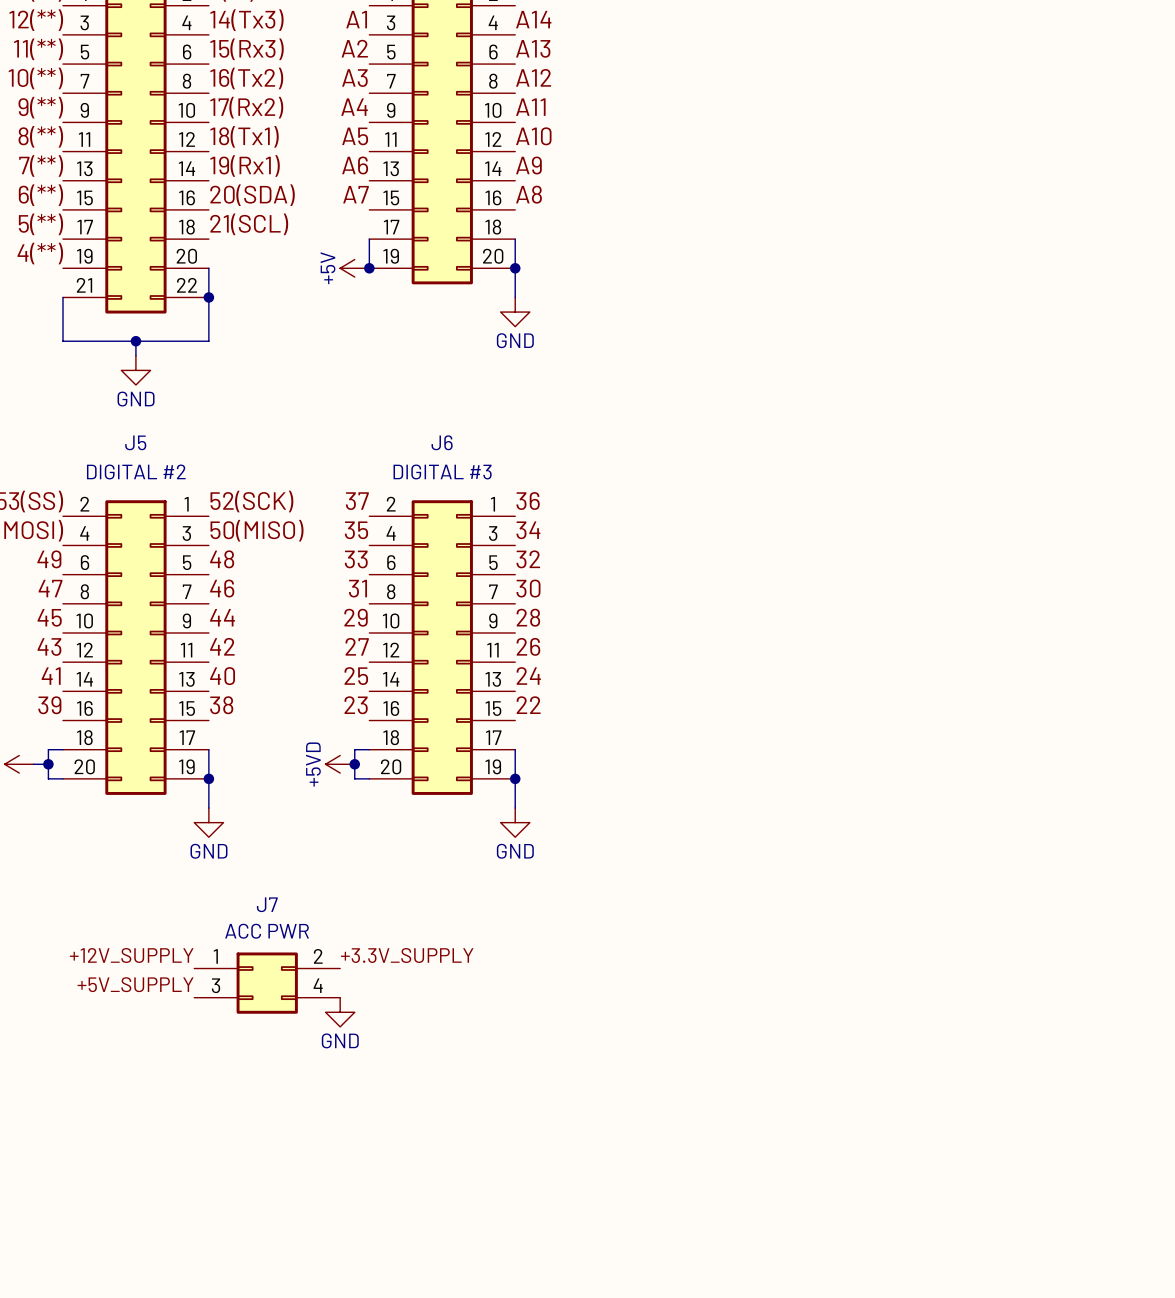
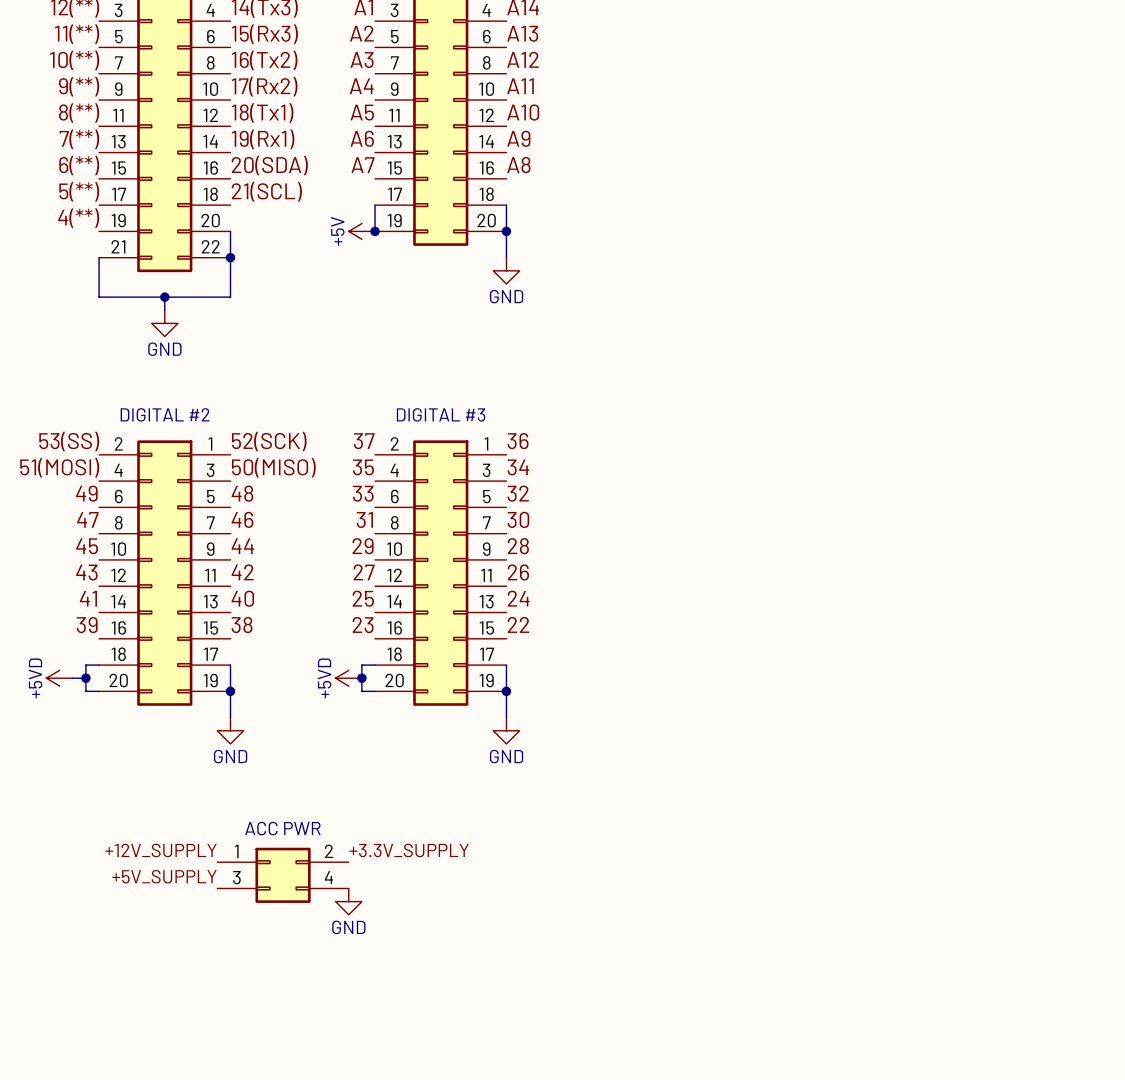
J5 name: J5 (135, 442) -> none
J6 name: J6 (442, 442) -> none
J7 name: J7 (267, 904) -> none

